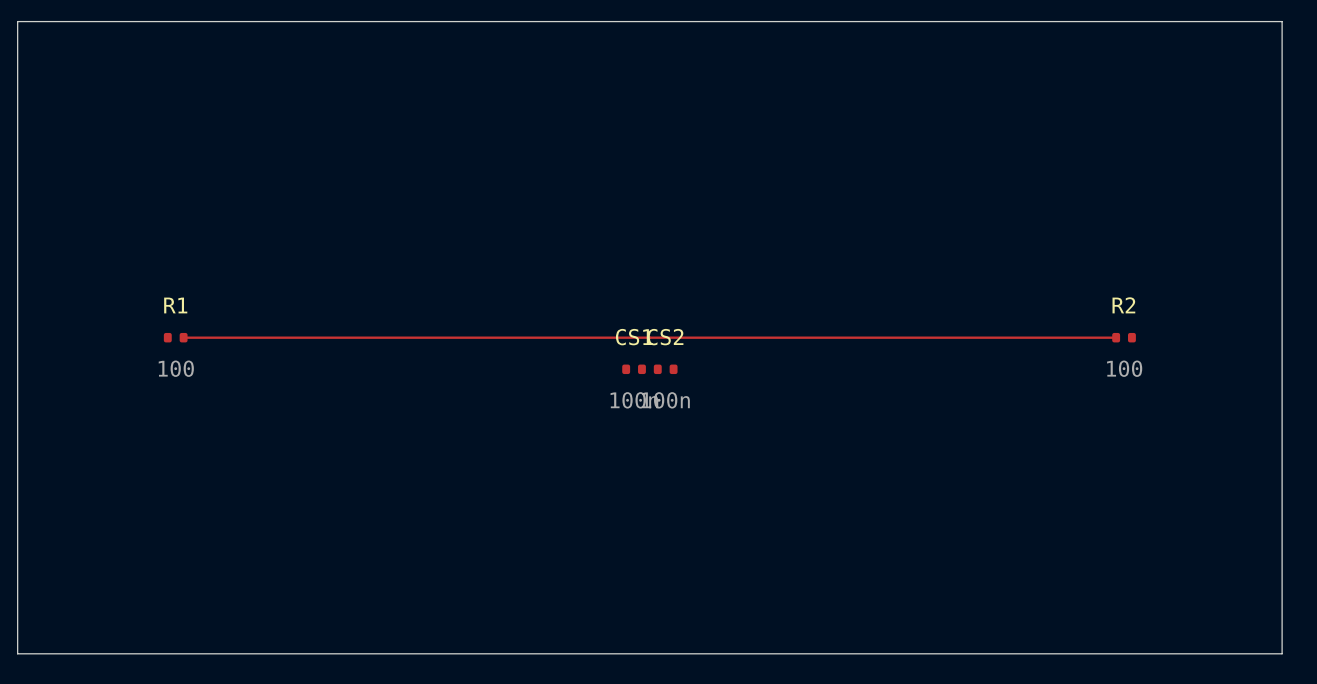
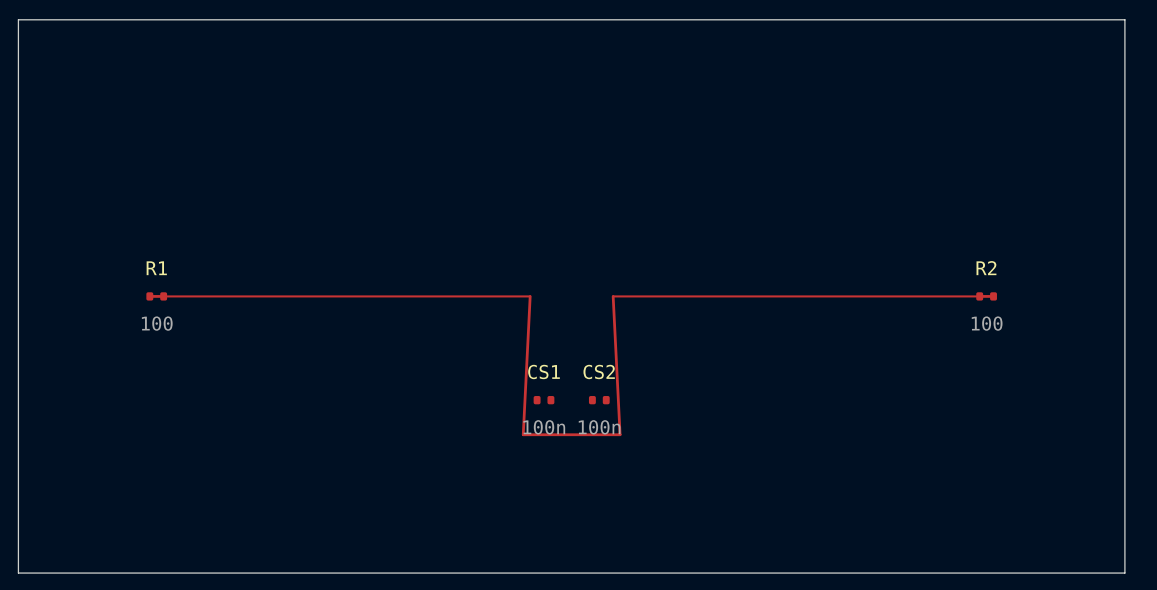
track: none -> (149, 296) (163, 296)
track: (602, 337) (697, 337) -> (530, 296) (523, 434) (620, 434) (613, 296)
track: none -> (979, 296) (993, 296)
CS1 position: (634, 369) -> (544, 400)
CS2 position: (665, 369) -> (599, 400)

